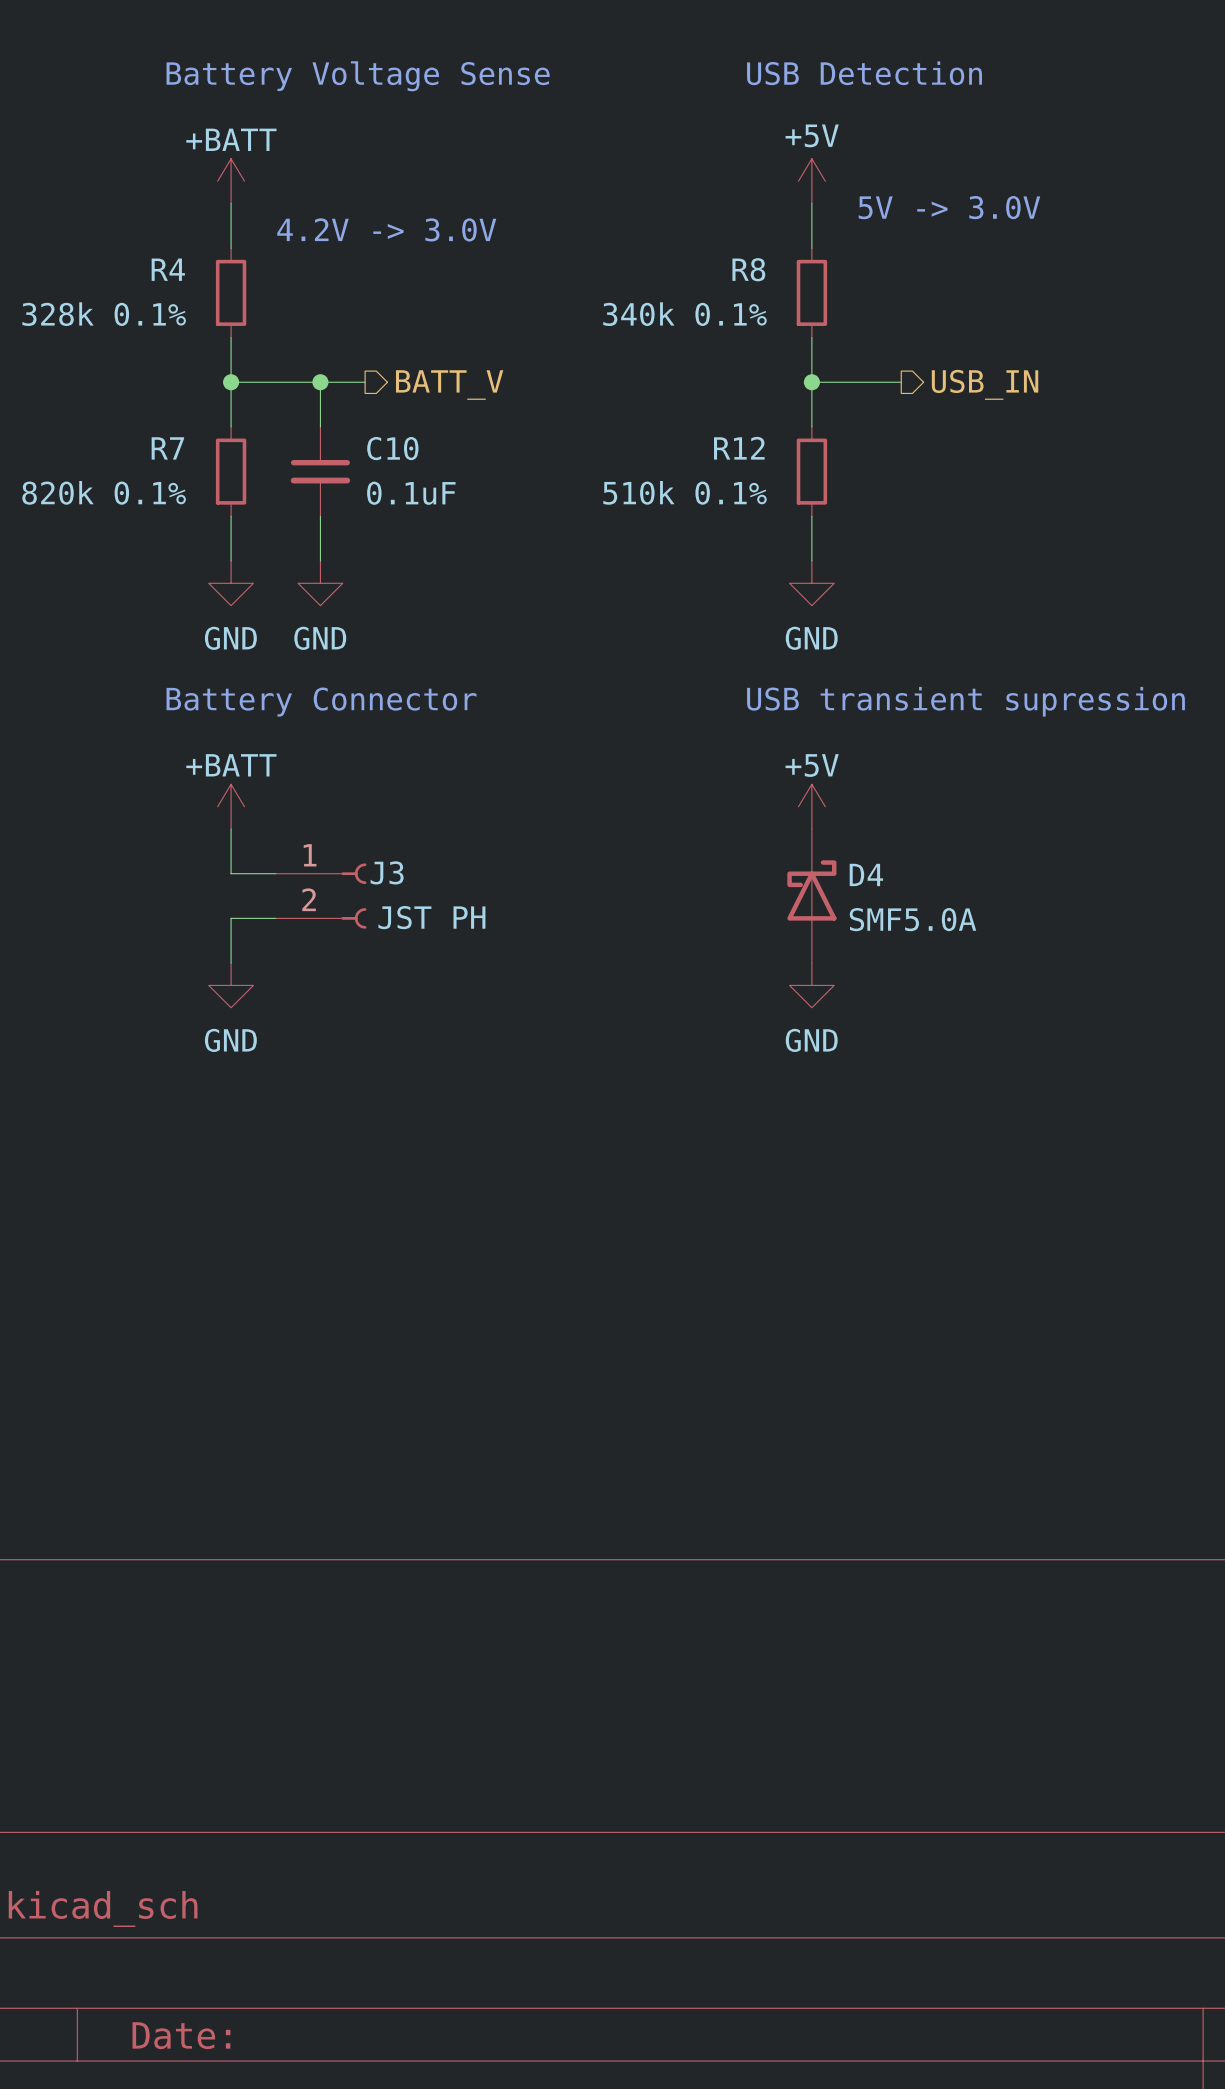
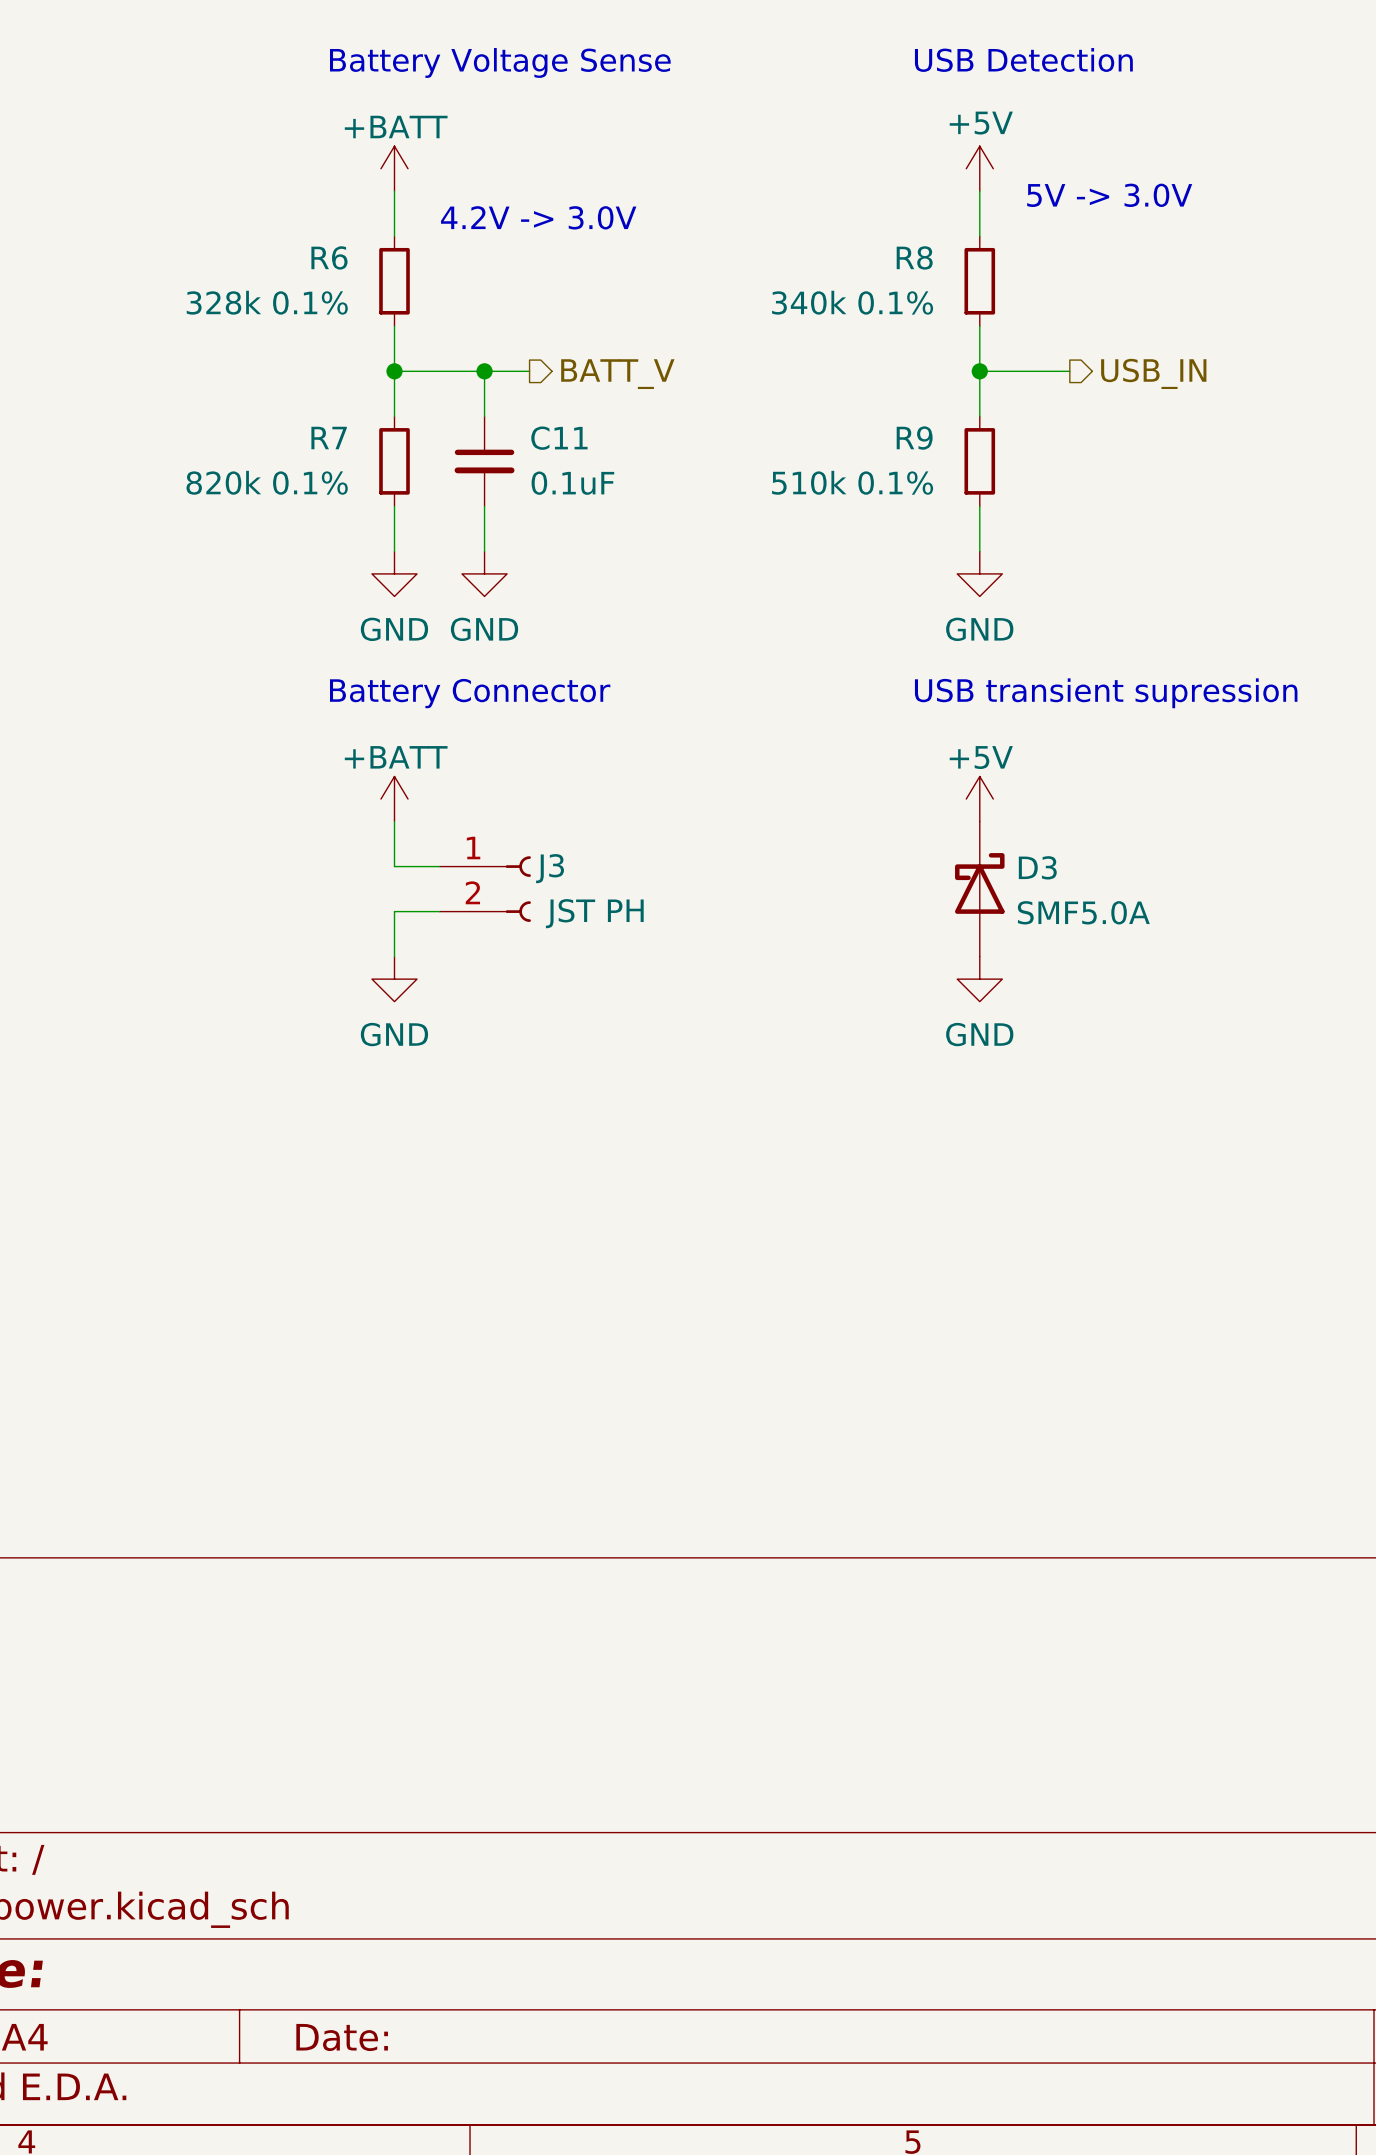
R4 name: R4 (168, 269) -> R6 (329, 257)
C10 name: C10 (392, 448) -> C11 (559, 438)
R12 name: R12 (739, 448) -> R9 (914, 438)
D4 name: D4 (866, 874) -> D3 (1037, 867)

